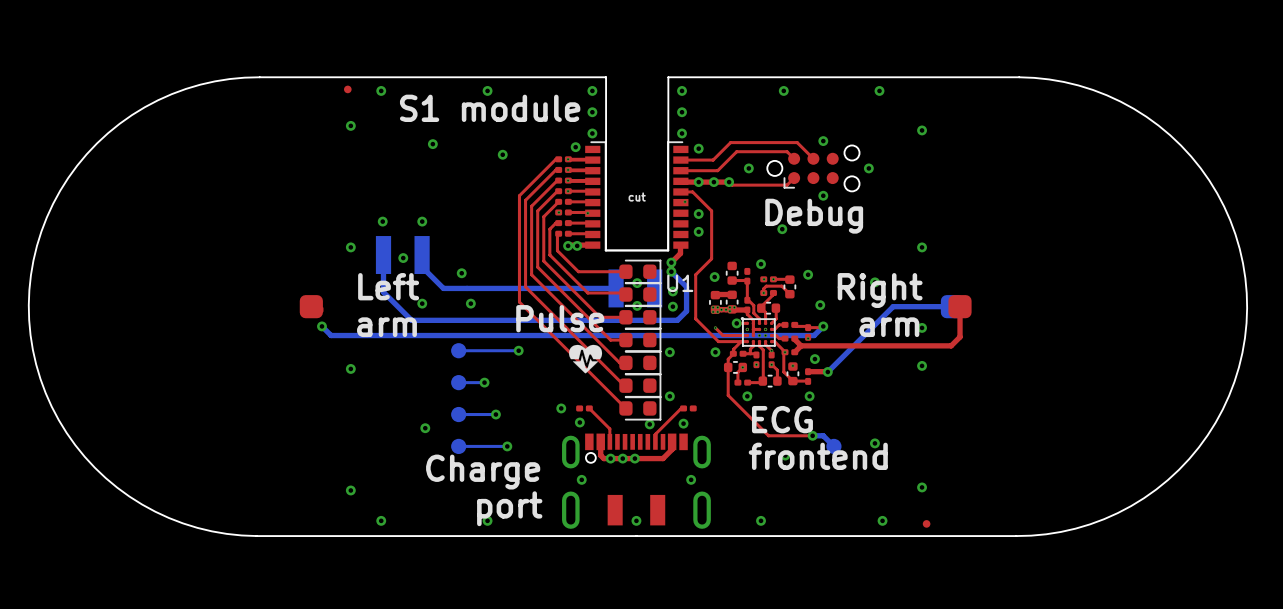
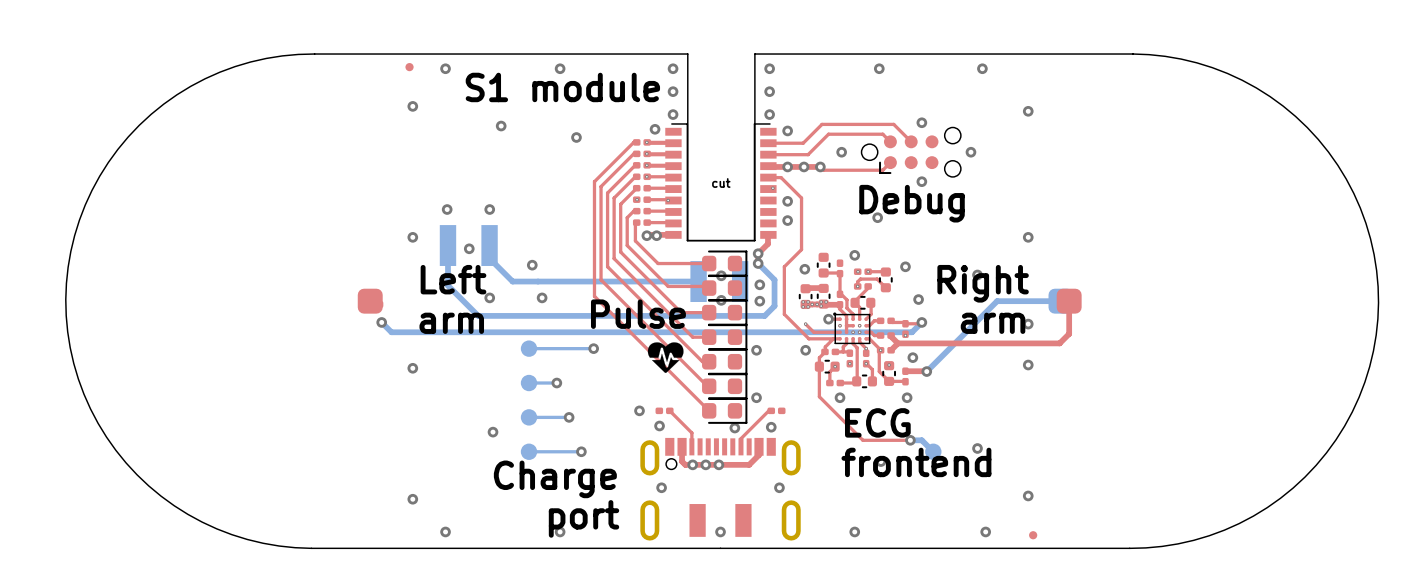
U1 name: U1 (680, 283) -> none

